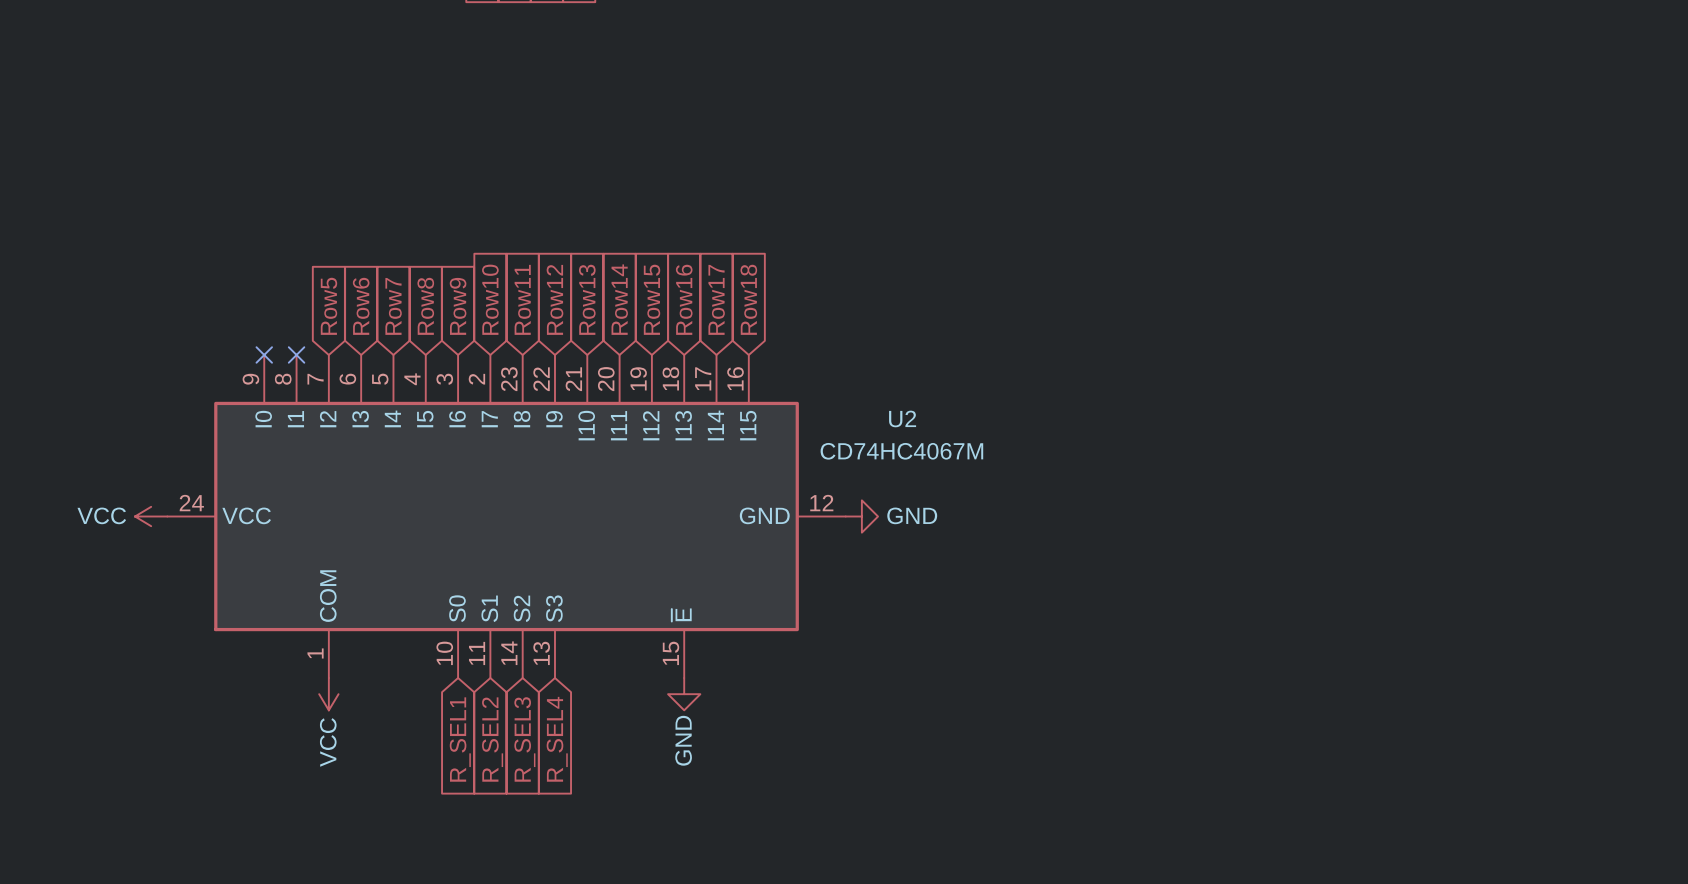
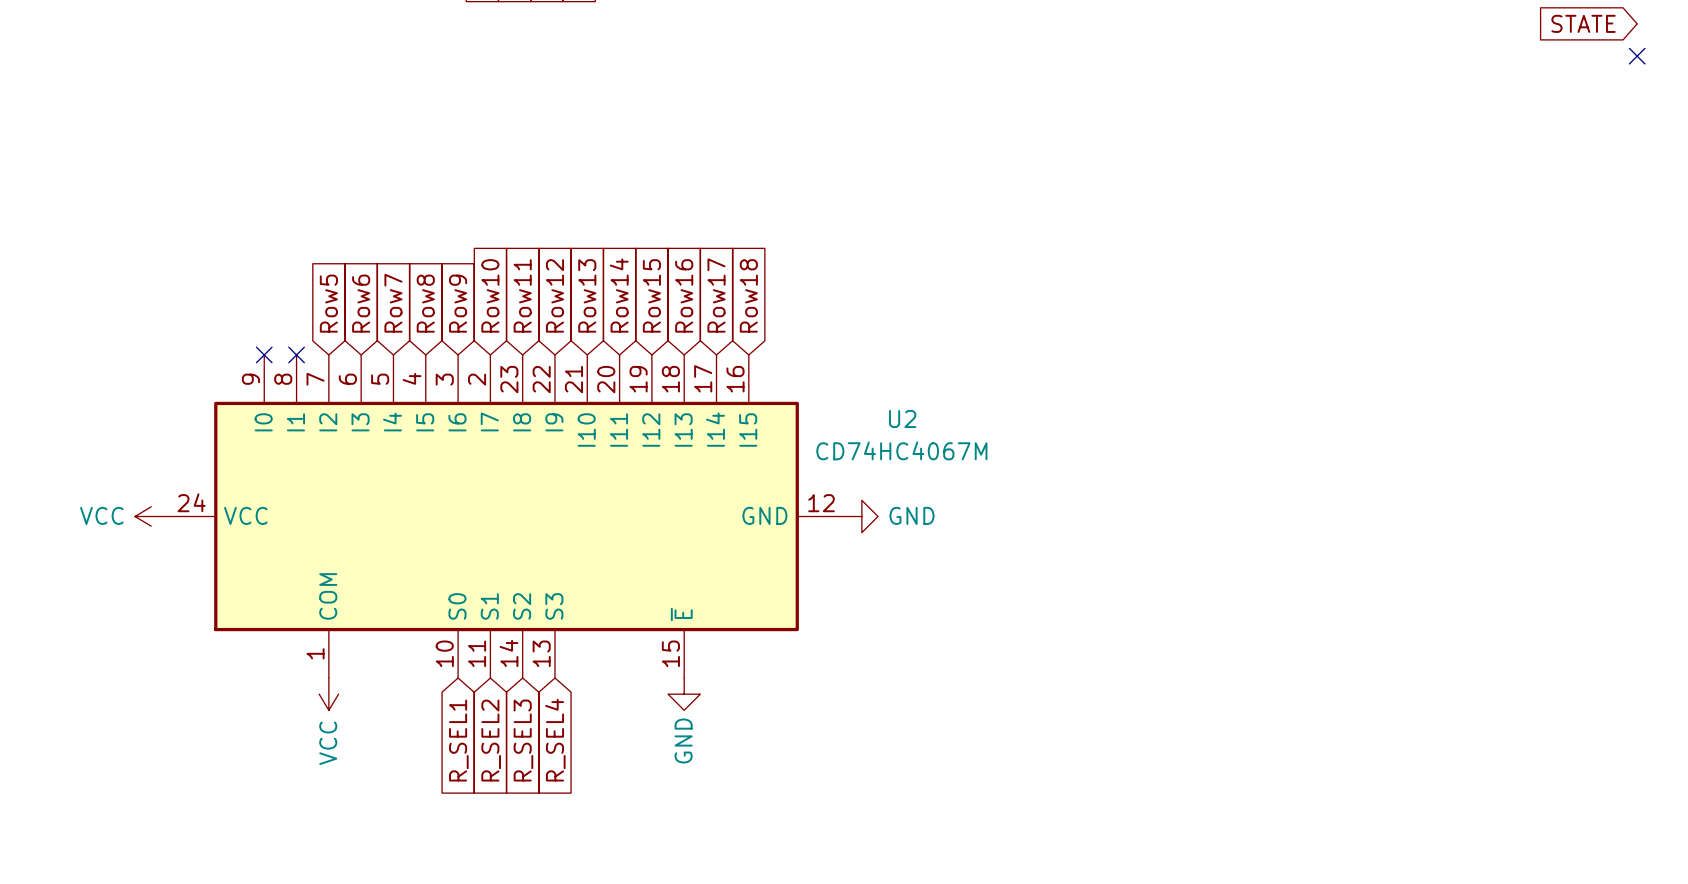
global label: none -> STATE (1583, 23)
no-connect mark: none -> (1637, 56)

